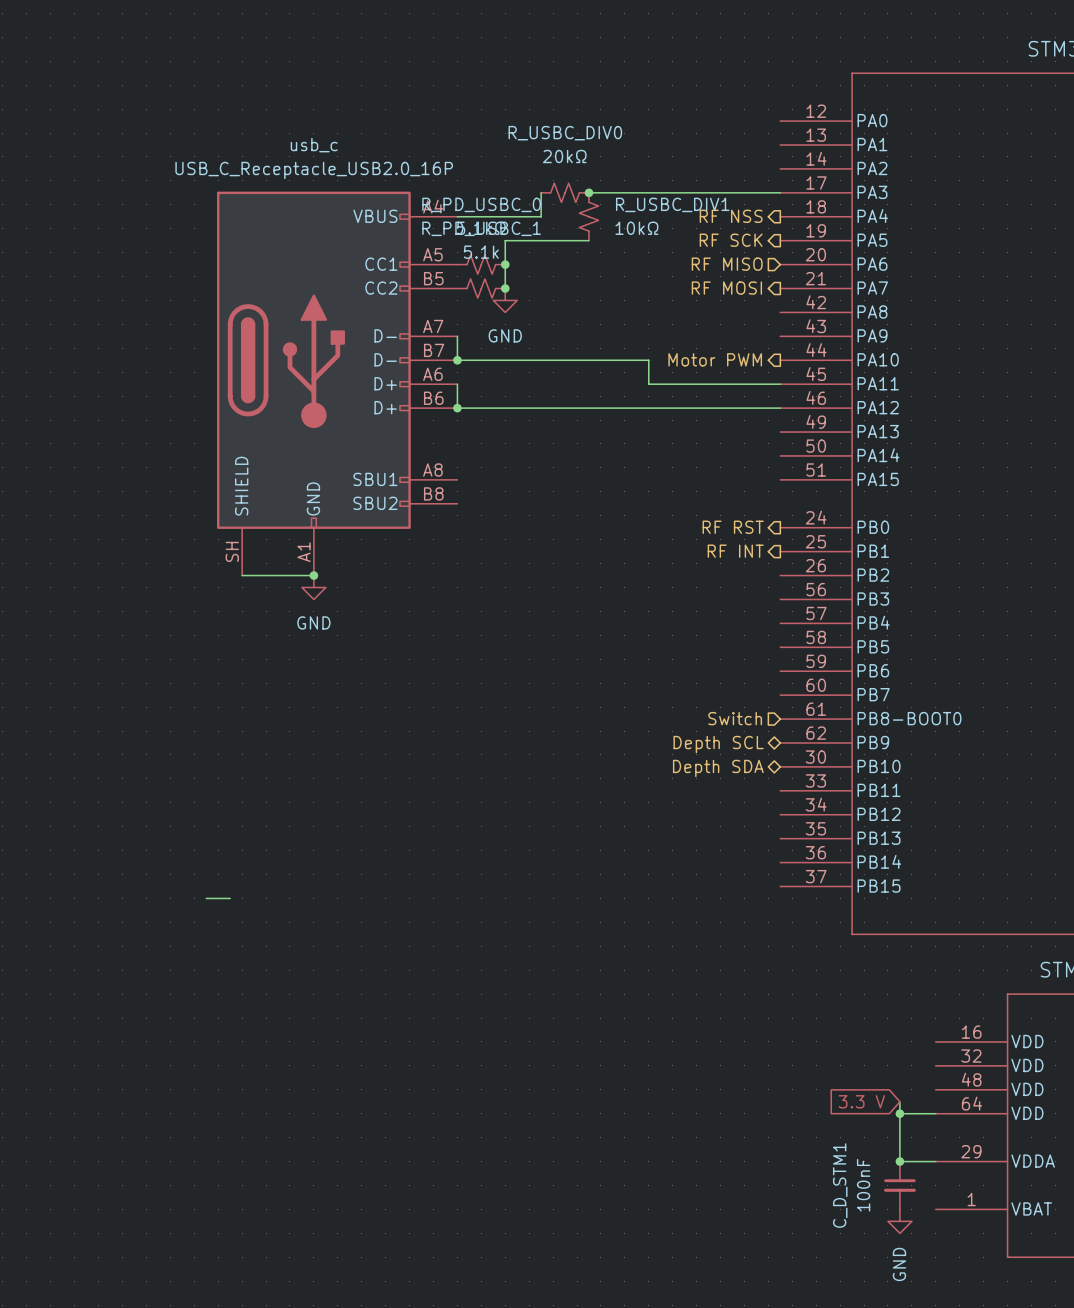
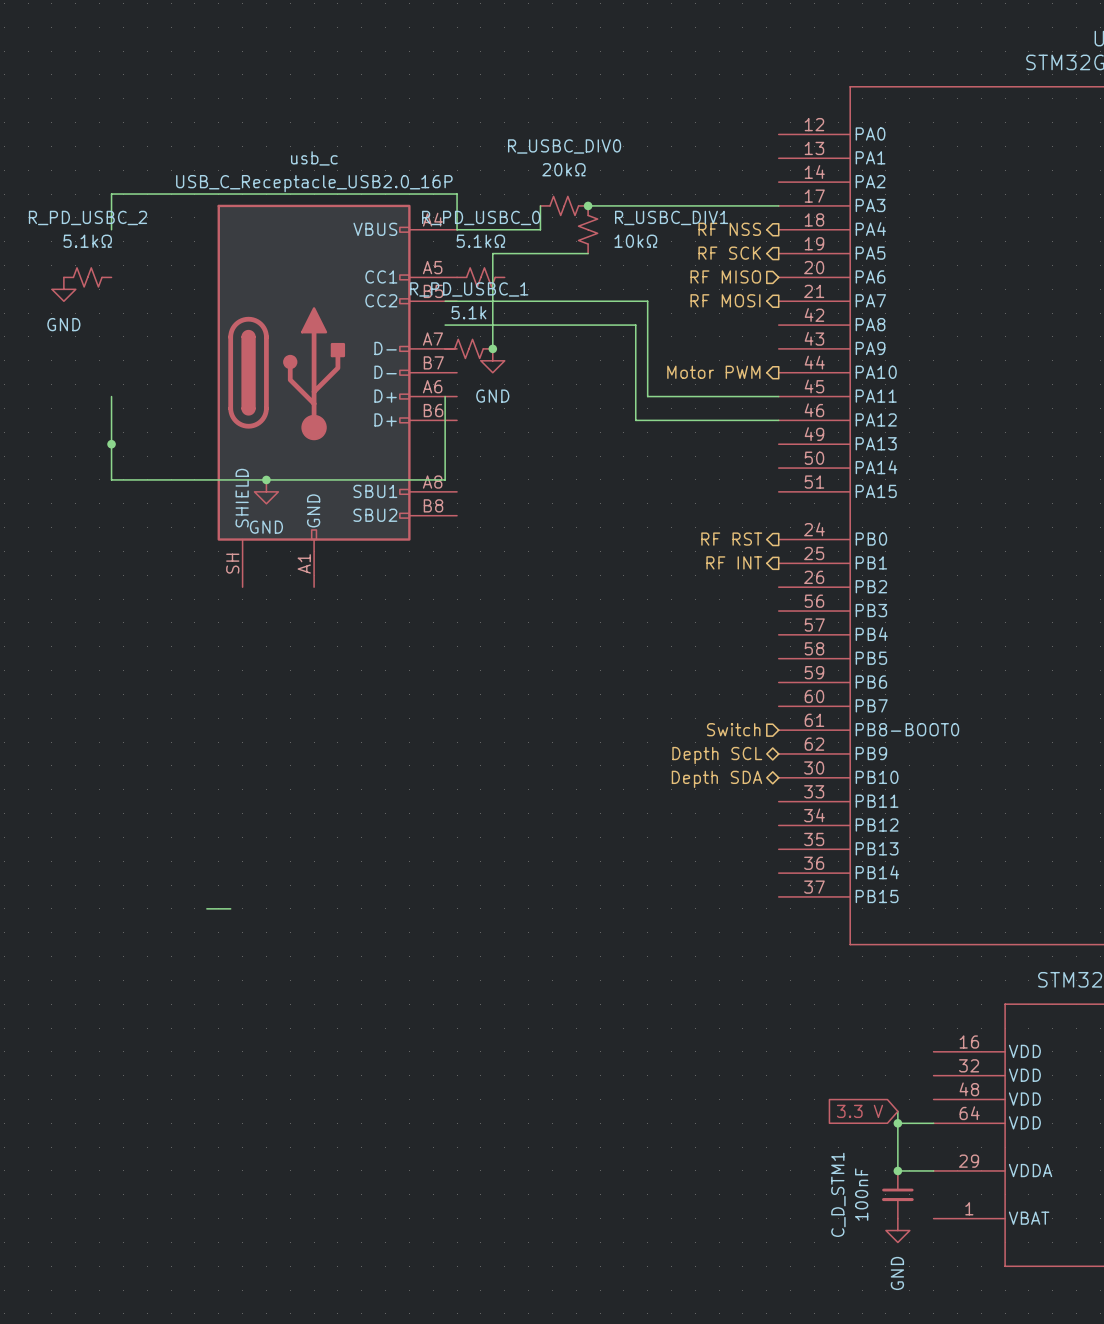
wire: none -> (111, 229) (111, 194) (457, 194) (457, 229)
wire: (505, 240) (505, 288) -> (504, 253) (492, 253) (492, 348)
R_PD_USBC_2: none -> 5.1kΩ (87, 277)
junction: (505, 264) -> none
power symbol: none -> GND (63, 289)
R_PD_USBC_1 position: (481, 288) -> (468, 348)
junction: (505, 288) -> none
power symbol position: GND (505, 300) -> GND (492, 360)
wire: (457, 336) (457, 360) (648, 360) -> (445, 301) (647, 301) (647, 372)
junction: none -> (492, 348)
junction: (457, 360) -> none
wire: none -> (111, 396) (111, 479) (445, 479) (445, 396)
wire: (457, 384) (457, 408) (636, 408) -> (445, 325) (635, 325) (635, 420)
junction: (457, 408) -> none
junction: none -> (111, 444)
junction: none -> (266, 479)
wire: (242, 575) (313, 575) -> none
junction: (313, 575) -> none
power symbol position: GND (313, 587) -> GND (266, 491)

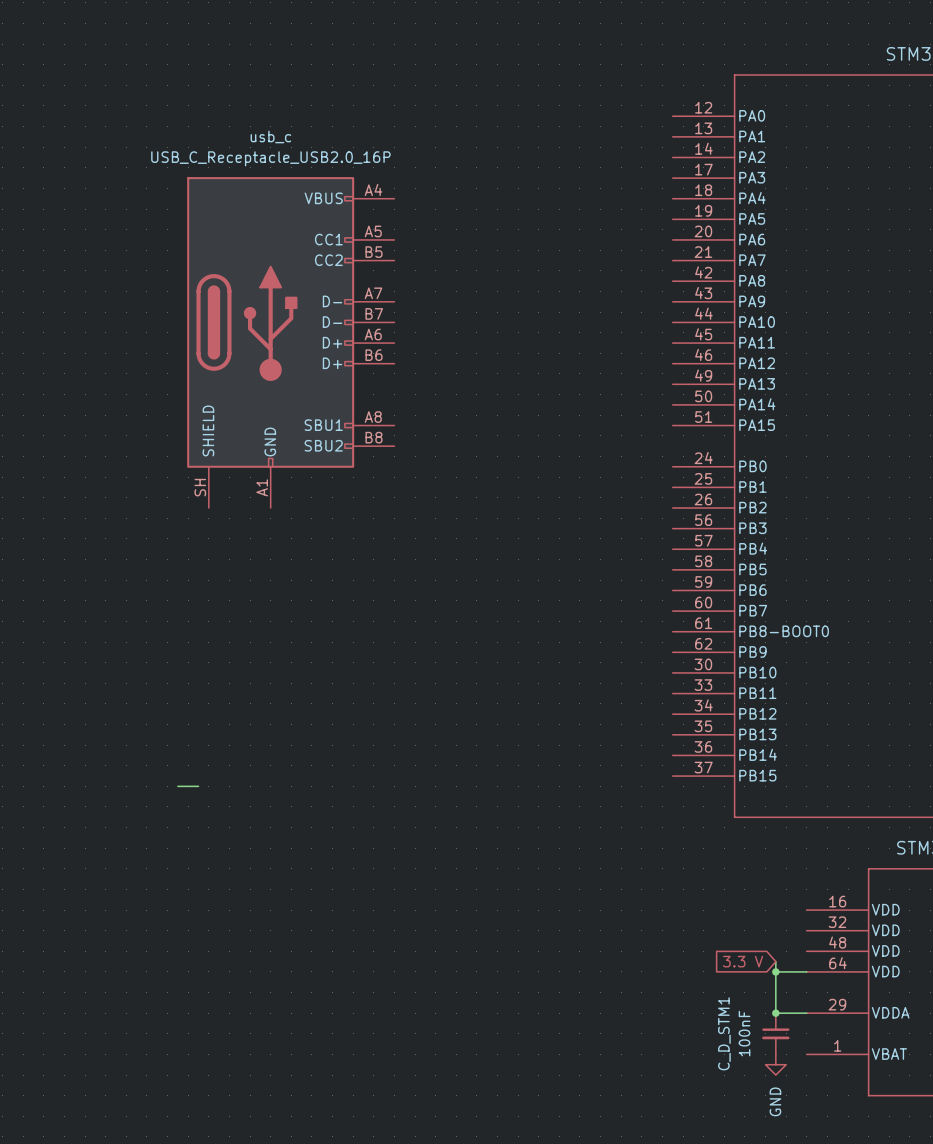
wire: (540, 205) (540, 229) (457, 229) (457, 194) (111, 194) (111, 229) -> none
R_USBC_DIV0: 20kΩ (564, 205) -> none
wire: (588, 205) (778, 205) -> none
junction: (588, 205) -> none
R_USBC_DIV1: 10kΩ (588, 229) -> none
hierarchical label: RF NSS (729, 229) -> none
wire: (588, 253) (492, 253) (492, 348) -> none
hierarchical label: RF SCK (729, 253) -> none
hierarchical label: RF MISO (725, 276) -> none
R_PD_USBC_2: 5.1kΩ (87, 277) -> none
R_PD_USBC_0: 5.1kΩ (480, 277) -> none
power symbol: GND (63, 289) -> none
hierarchical label: RF MOSI (725, 300) -> none
wire: (445, 301) (647, 301) (647, 396) (778, 396) -> none
wire: (445, 325) (635, 325) (635, 420) (778, 420) -> none
R_PD_USBC_1: 5.1k (468, 348) -> none
junction: (492, 348) -> none
power symbol: GND (492, 360) -> none
hierarchical label: Motor PWM (713, 372) -> none
wire: (111, 396) (111, 479) (445, 479) (445, 396) -> none
junction: (111, 444) -> none
junction: (266, 479) -> none
power symbol: GND (266, 491) -> none
hierarchical label: RF RST (731, 539) -> none
hierarchical label: RF INT (734, 562) -> none
hierarchical label: Switch (733, 729) -> none
hierarchical label: Depth SCL (717, 755) -> none
hierarchical label: Depth SDA (716, 779) -> none

